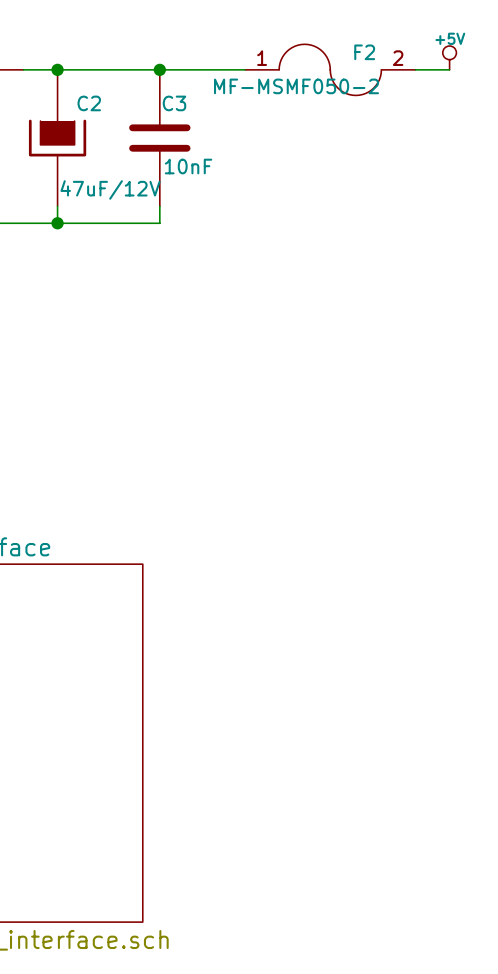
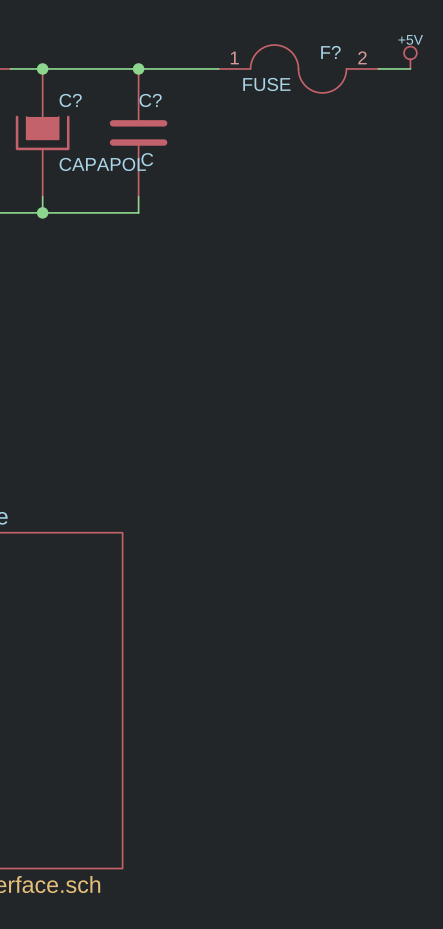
F2 name: F2 (364, 52) -> F? (330, 52)
F2 value: MF-MSMF050-2 (296, 86) -> FUSE (266, 84)
C2 name: C2 (89, 103) -> C? (70, 100)
C3 name: C3 (174, 103) -> C? (150, 100)
C3 value: 10nF (188, 166) -> C (147, 159)
C2 value: 47uF/12V (110, 189) -> CAPAPOL (102, 164)

